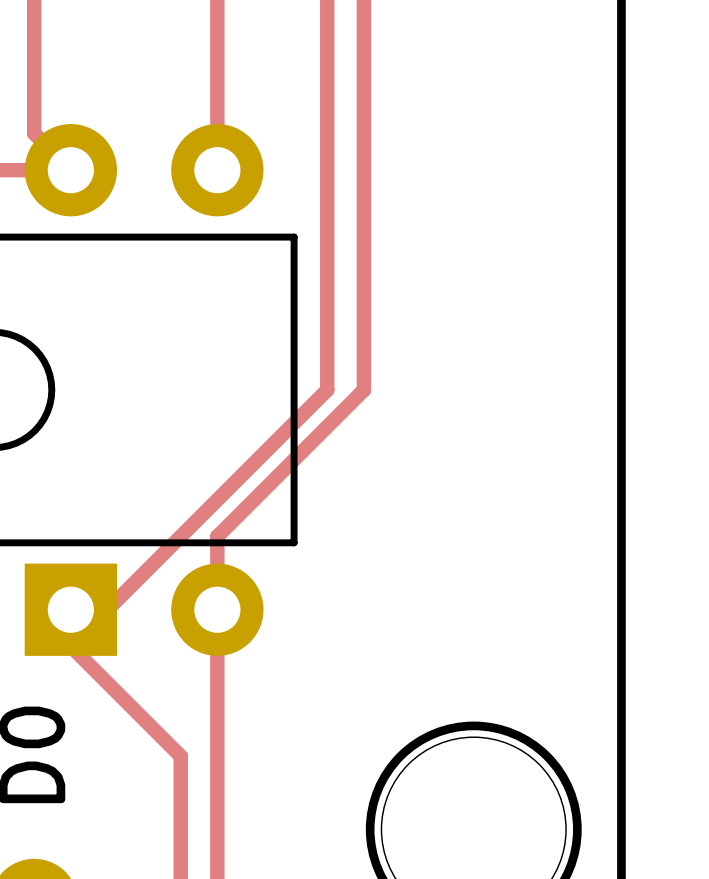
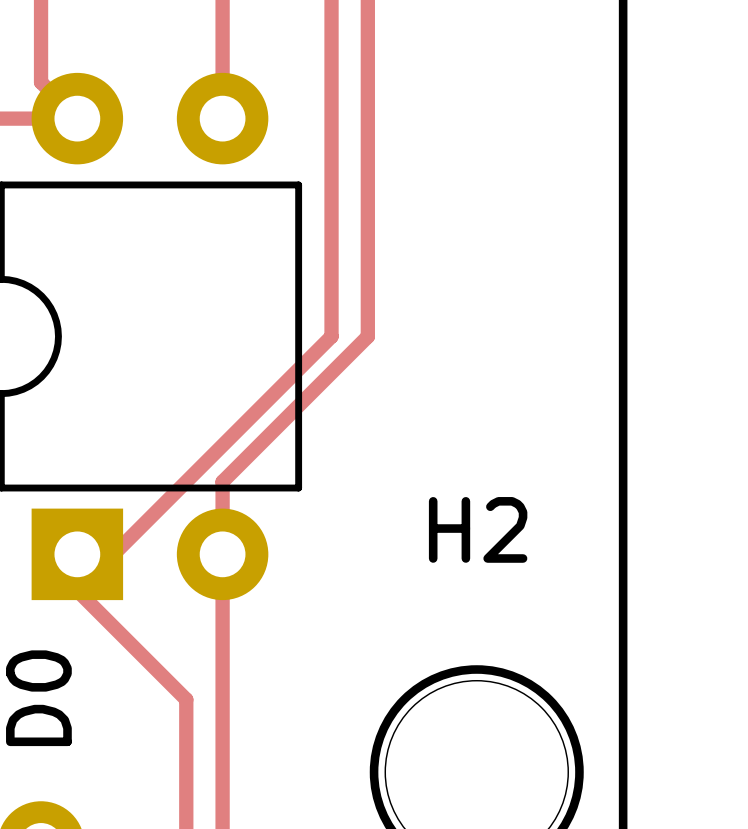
H2 name: none -> H2 (478, 529)

